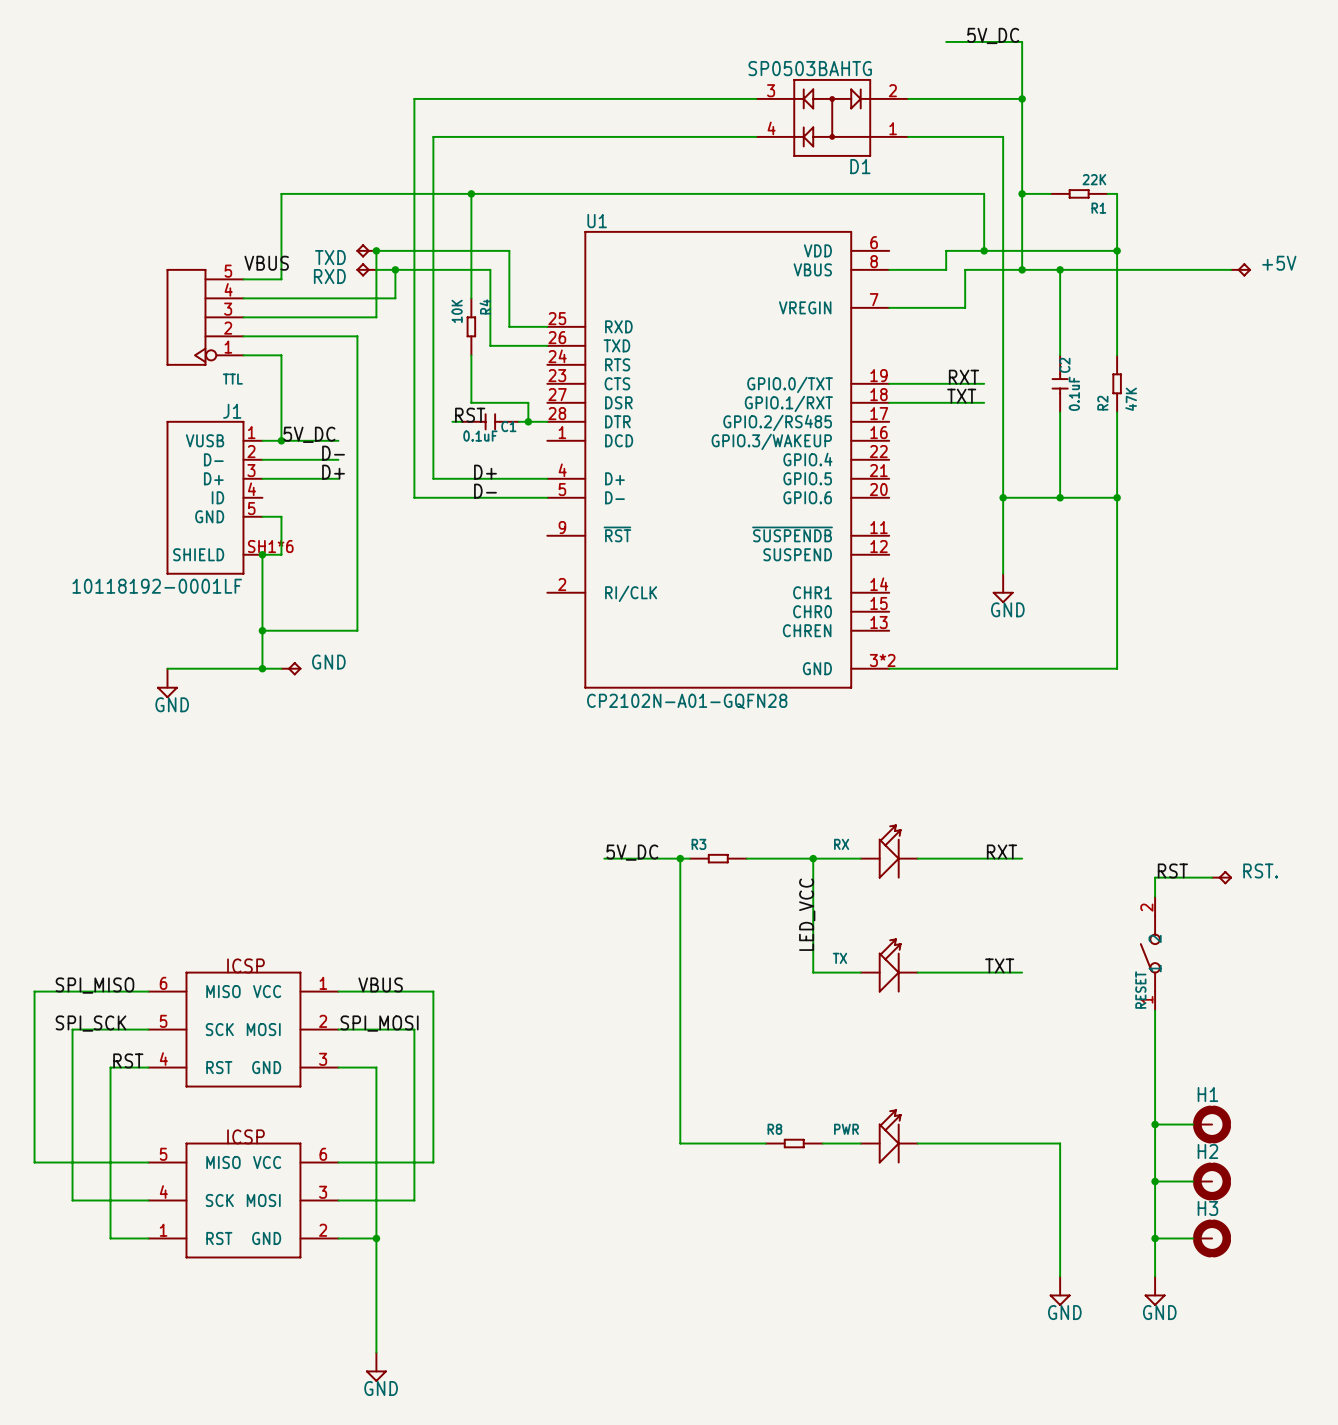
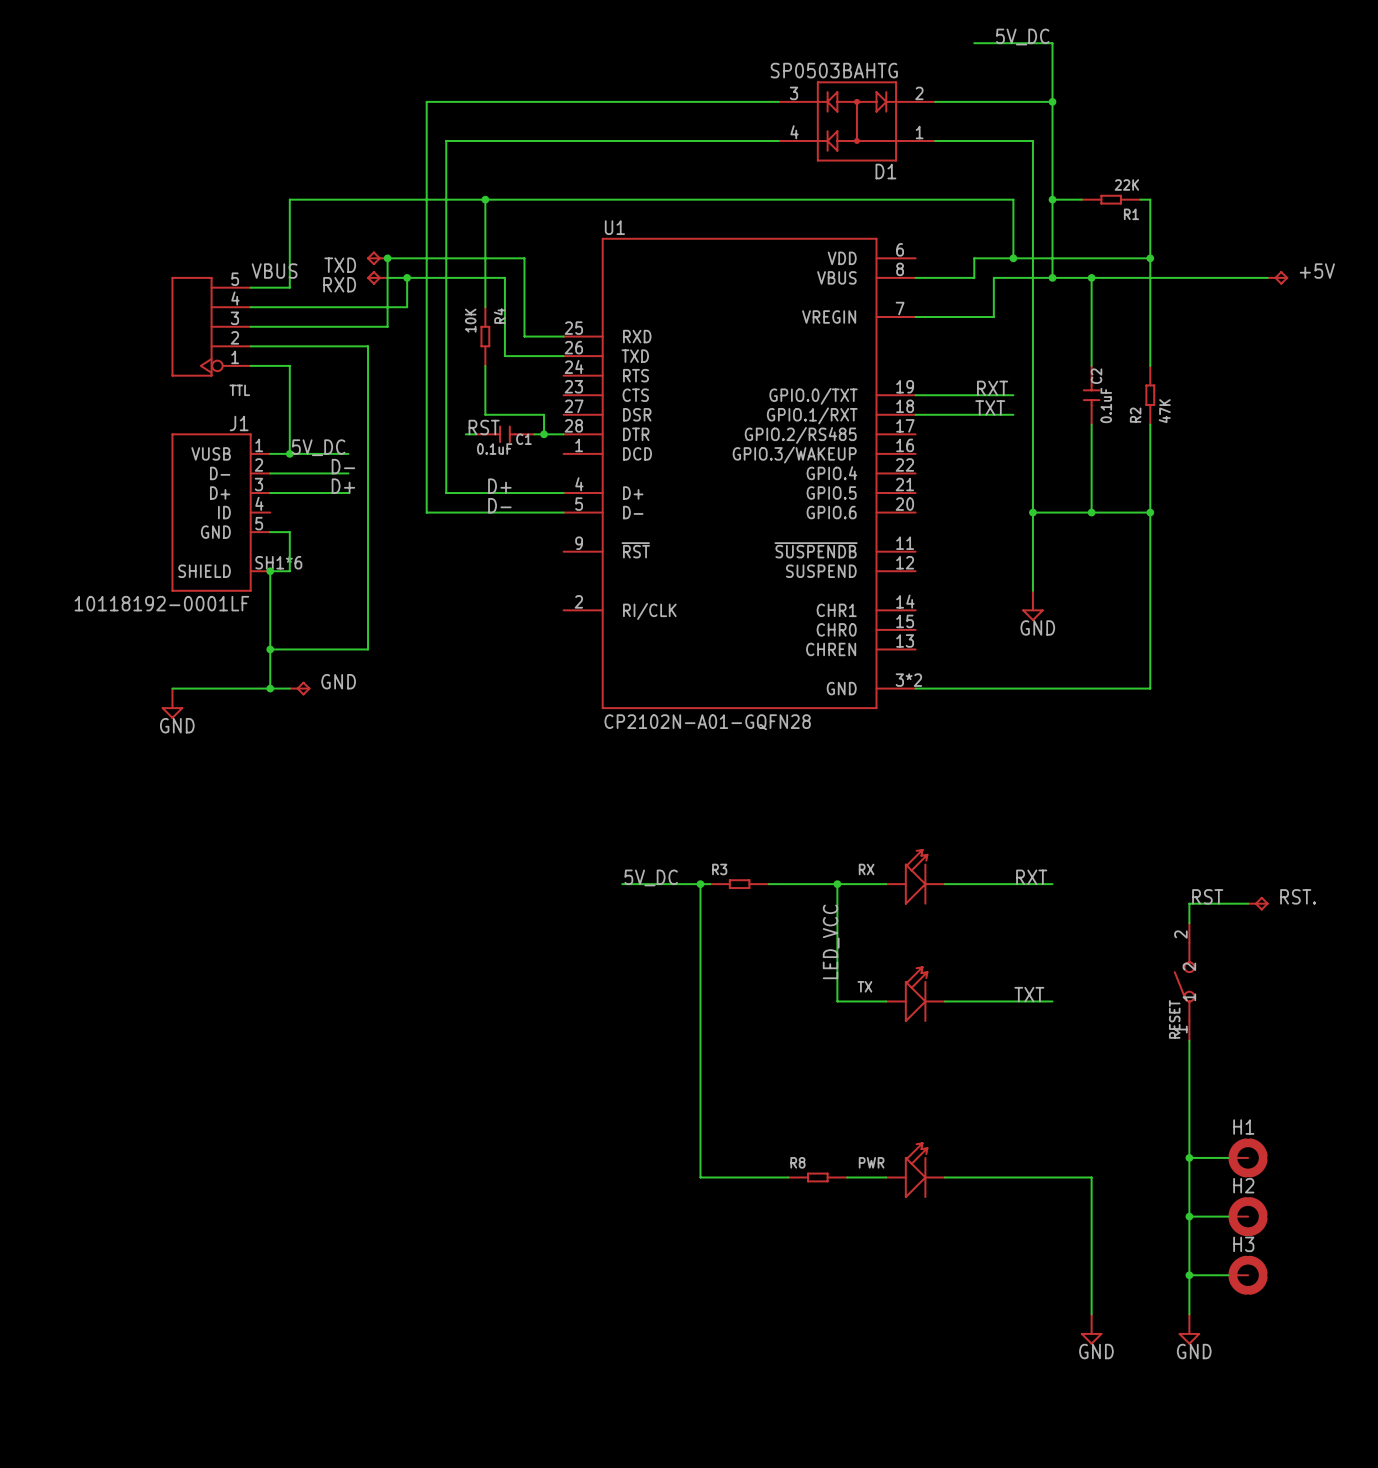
label: VBUS (380, 984) -> none
label: SPI_MISO (94, 985) -> none
wire: (148, 991) (34, 991) (34, 1162) (148, 1162) -> none
wire: (338, 991) (433, 991) (433, 1162) (338, 1162) -> none
label: SPI_SCK (90, 1023) -> none
label: SPI_MOSI (379, 1023) -> none
wire: (148, 1029) (72, 1029) (72, 1200) (148, 1200) -> none
part: (243, 1029) -> none
wire: (338, 1029) (414, 1029) (414, 1200) (338, 1200) -> none
label: RST (128, 1060) -> none
wire: (148, 1067) (110, 1067) (110, 1238) (148, 1238) -> none
wire: (338, 1067) (376, 1067) (376, 1352) -> none
part: (243, 1200) -> none
wire: (338, 1238) (376, 1238) -> none
junction: (376, 1238) -> none
power symbol: GND (376, 1367) -> none

